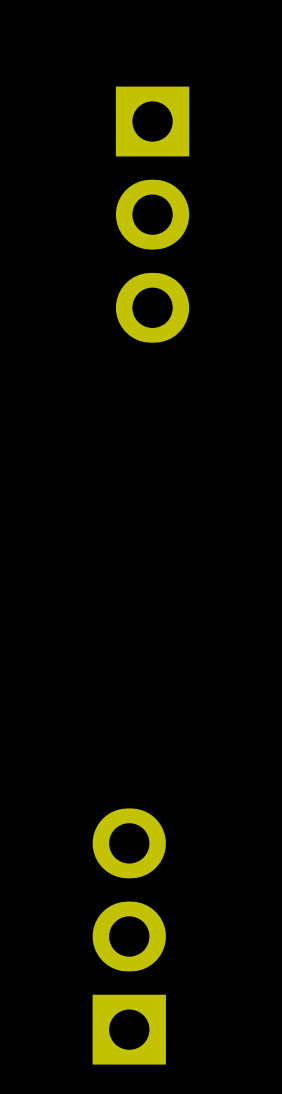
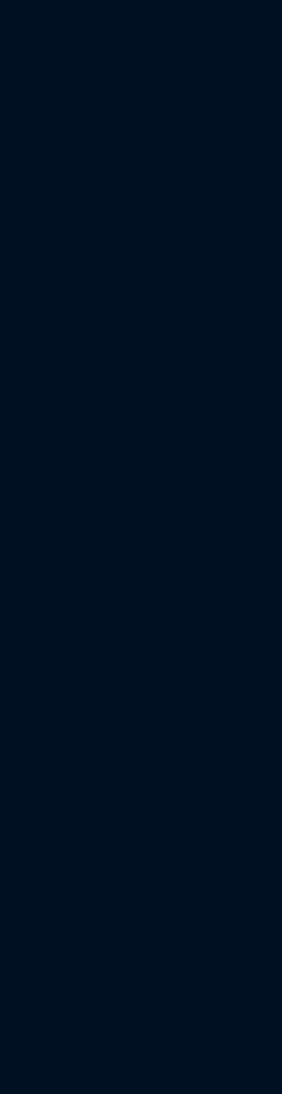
part: (152, 214) -> none
part: (129, 936) -> none

